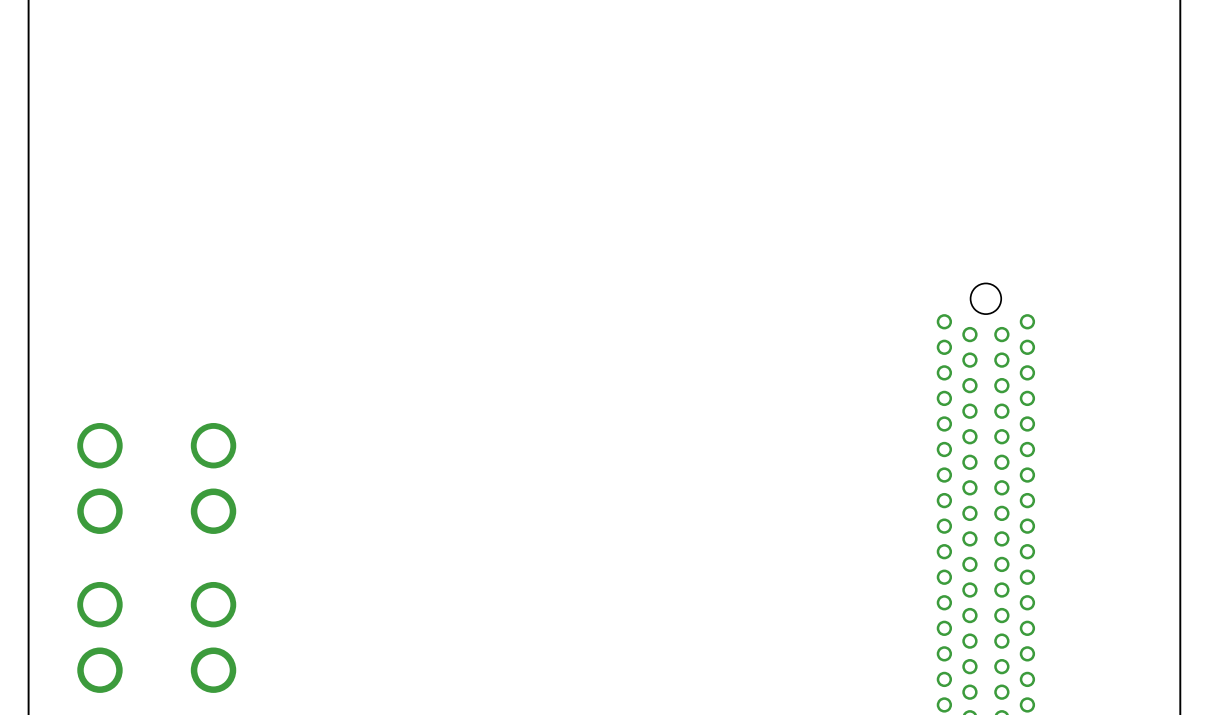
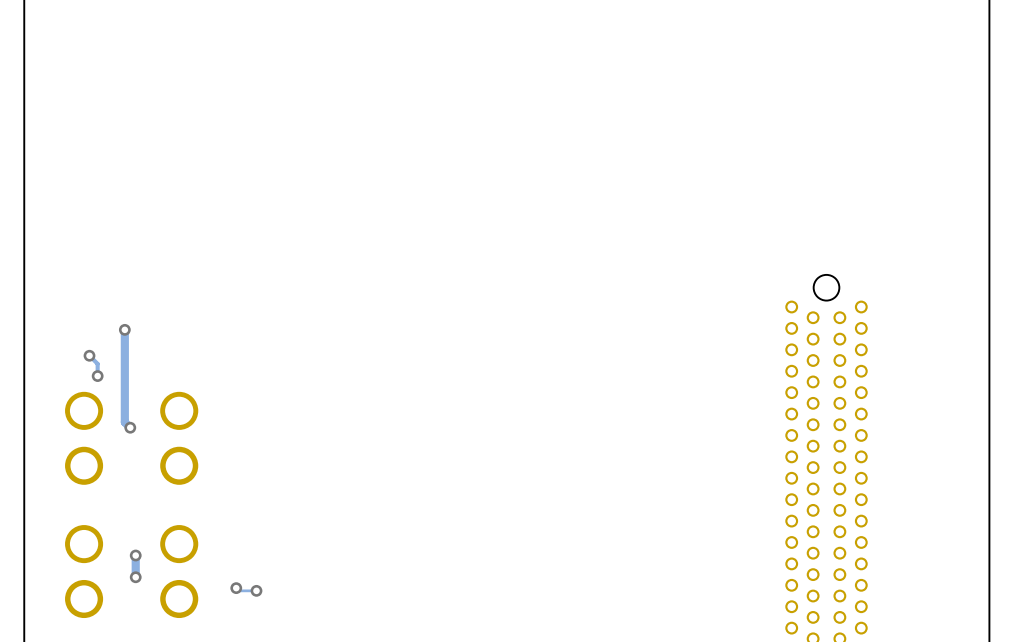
track: none -> (124, 329) (124, 422) (130, 427)
via: none -> (124, 329)
track: none -> (89, 355) (97, 363) (97, 376)
via: none -> (89, 355)
via: none -> (97, 376)
via: none -> (130, 427)
track: none -> (135, 555) (135, 577)
via: none -> (135, 555)
via: none -> (135, 577)
track: none -> (236, 588) (238, 590) (256, 590)
via: none -> (236, 588)
via: none -> (256, 590)

